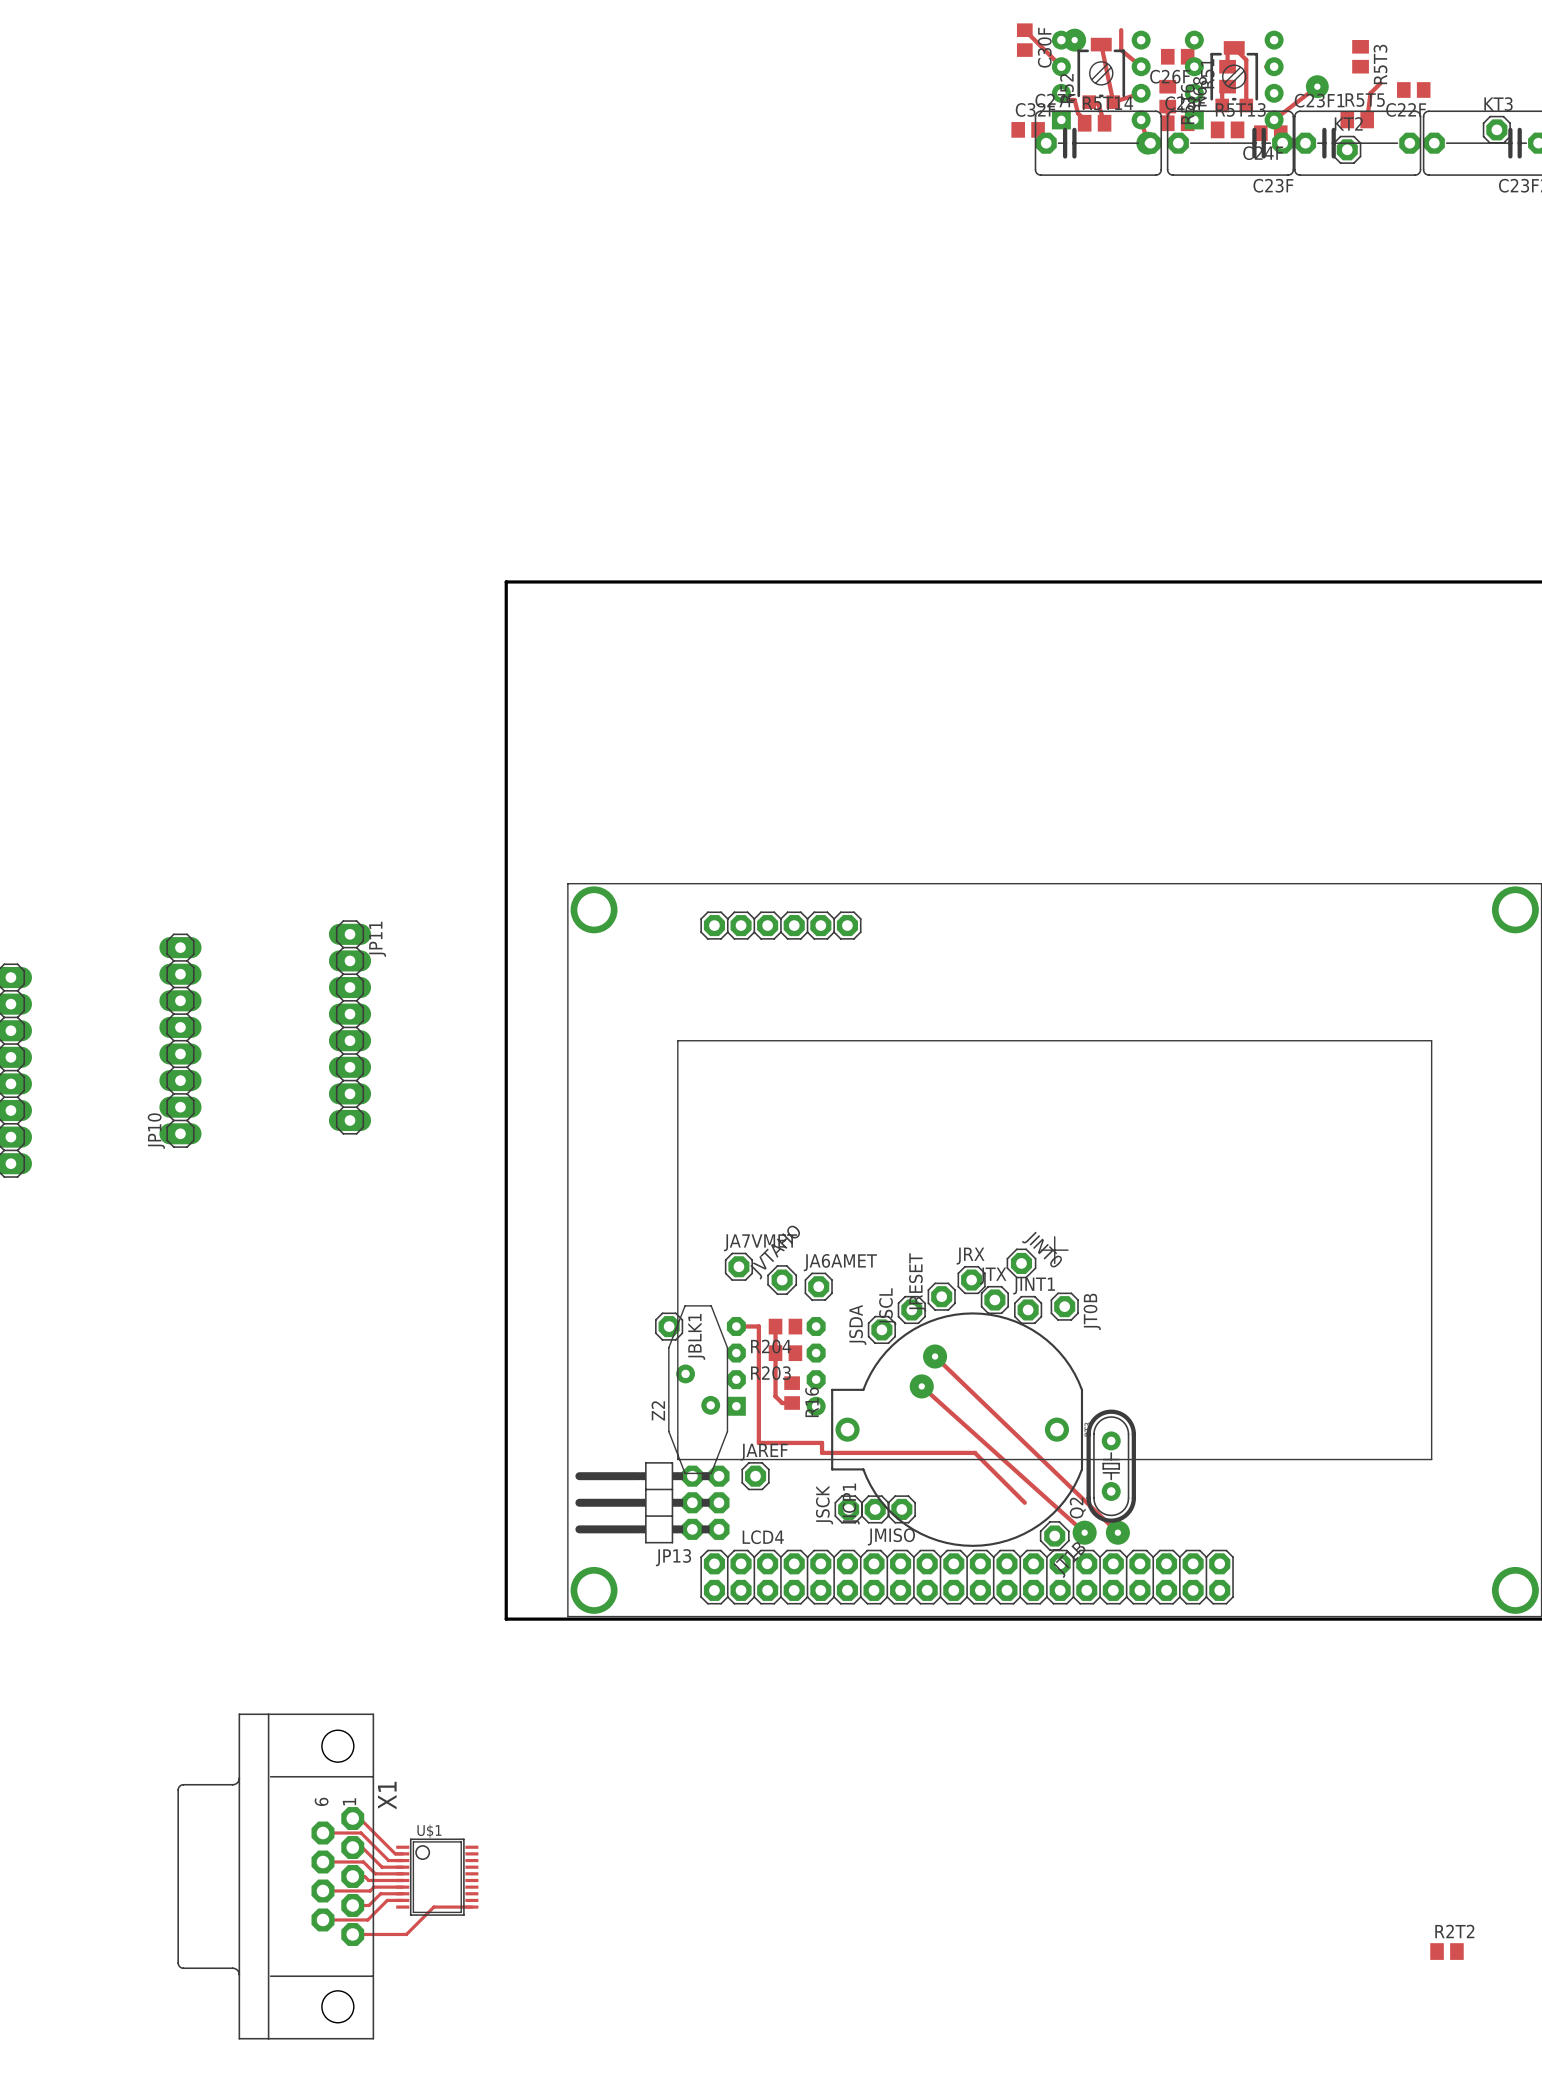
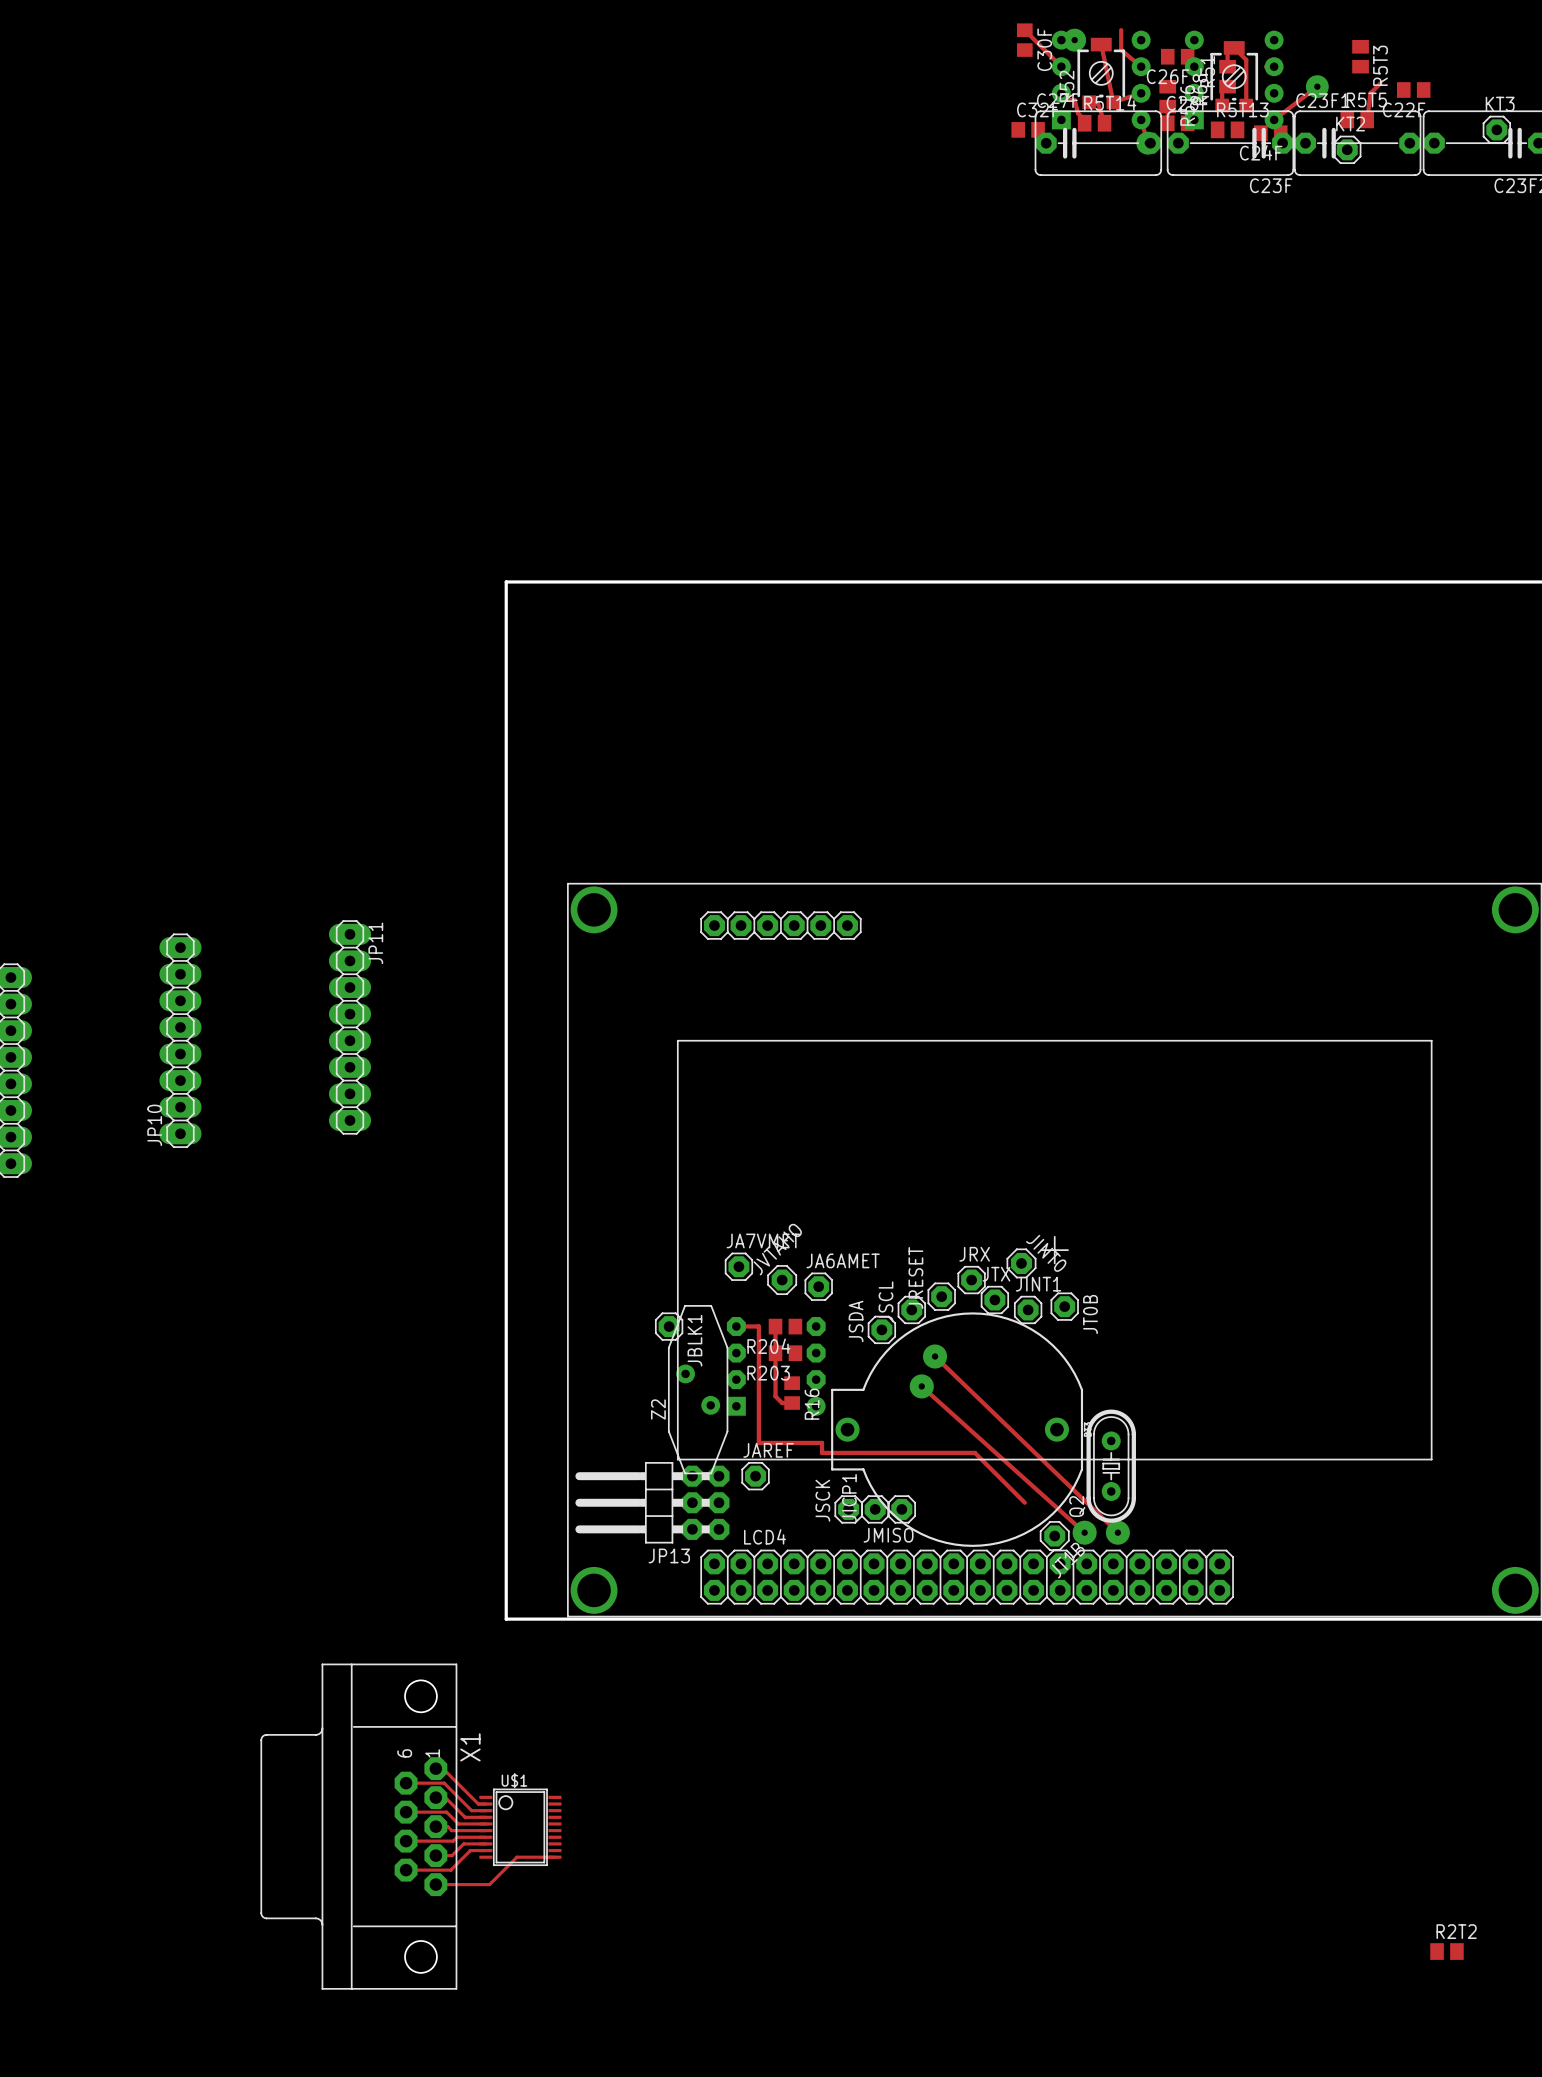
track: (352, 1818) (359, 1818) (395, 1853) (402, 1853) -> (435, 1768) (443, 1768) (478, 1804) (485, 1804)
track: (322, 1833) (361, 1833) (388, 1860) (402, 1860) -> (406, 1783) (444, 1783) (471, 1810) (485, 1810)
track: (352, 1847) (362, 1847) (381, 1867) (402, 1867) -> (435, 1797) (445, 1797) (465, 1817) (485, 1817)
track: (322, 1862) (363, 1862) (375, 1873) (402, 1873) -> (406, 1812) (446, 1812) (458, 1823) (485, 1823)
X1 position: (275, 1876) -> (358, 1826)
track: (352, 1876) (364, 1876) (368, 1880) (402, 1880) -> (435, 1826) (447, 1826) (451, 1830) (485, 1830)
U$1 position: (437, 1877) -> (520, 1827)
track: (402, 1887) (374, 1887) (370, 1890) (322, 1890) -> (485, 1837) (457, 1837) (453, 1841) (406, 1841)
track: (402, 1893) (380, 1893) (368, 1905) (352, 1905) -> (485, 1843) (463, 1843) (452, 1855) (435, 1855)
track: (402, 1900) (387, 1900) (367, 1919) (322, 1919) -> (485, 1850) (470, 1850) (450, 1870) (406, 1870)
track: (471, 1907) (433, 1907) (406, 1934) (352, 1934) -> (554, 1857) (516, 1857) (489, 1884) (435, 1884)

